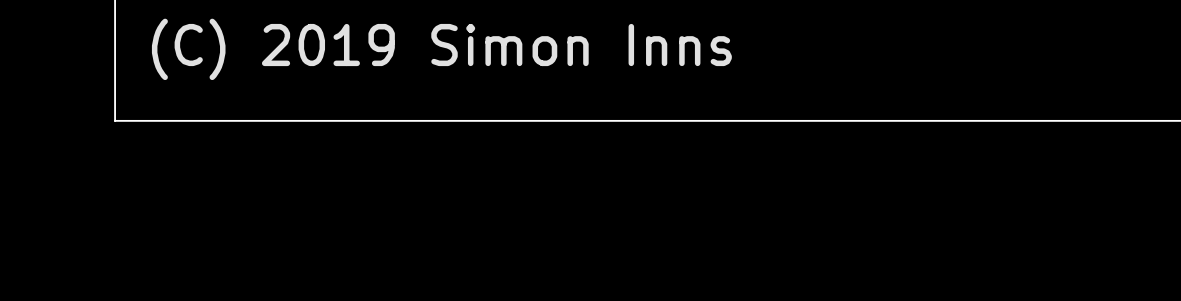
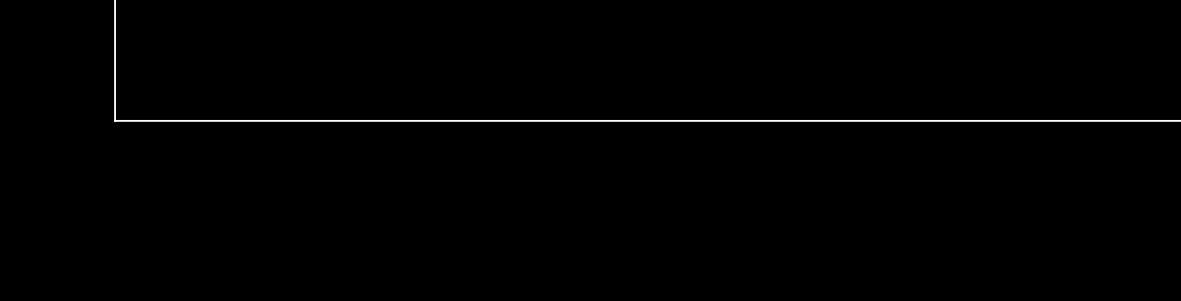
text: (C) 2019 Simon Inns (441, 49) -> none

